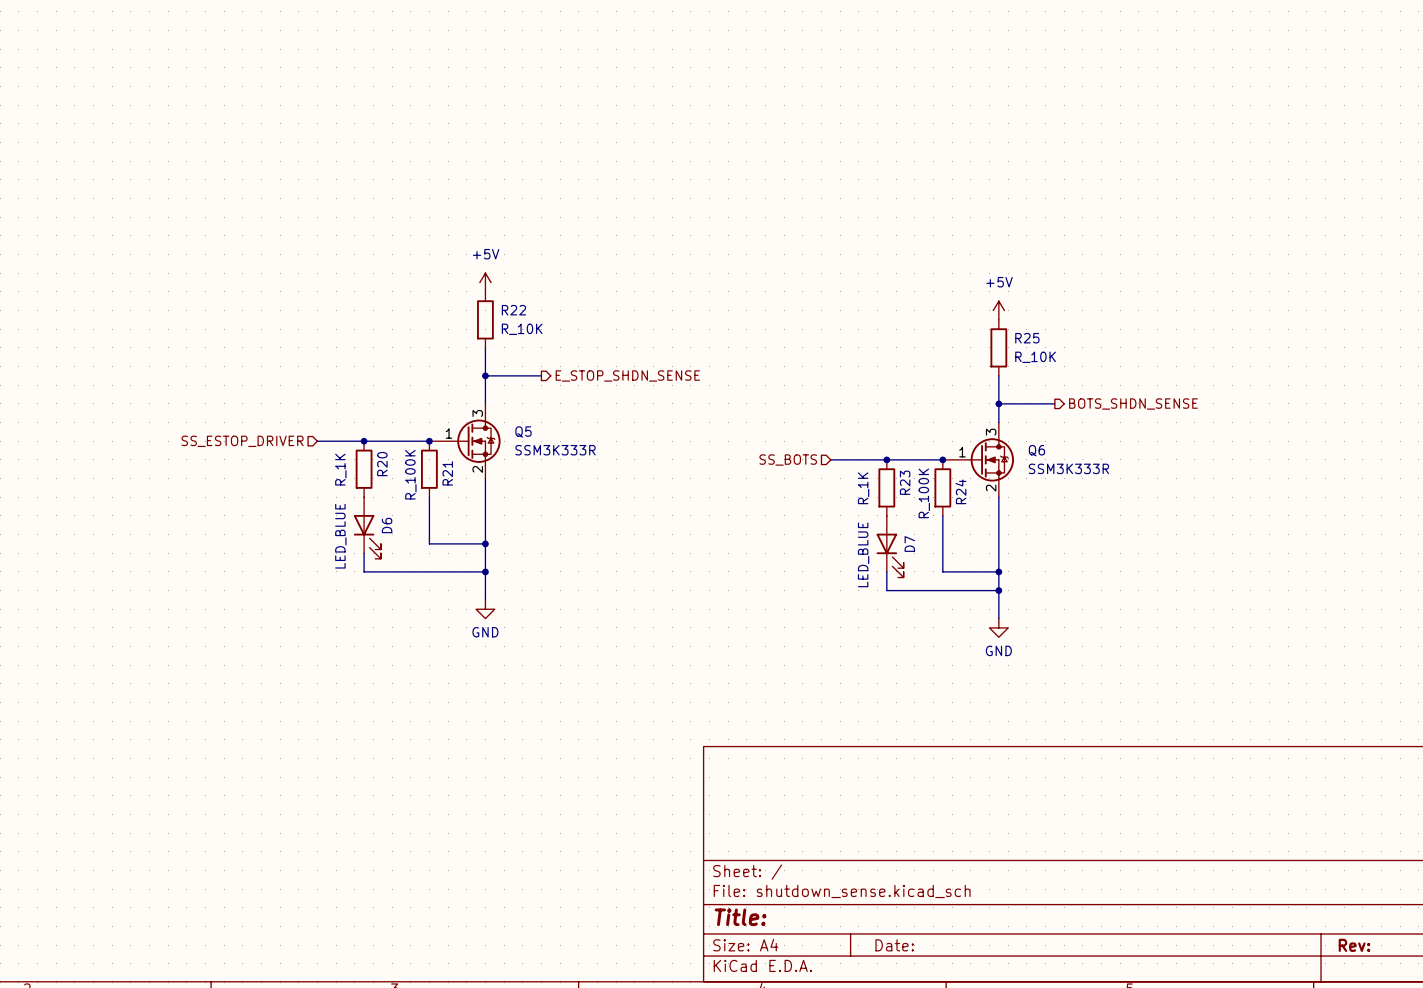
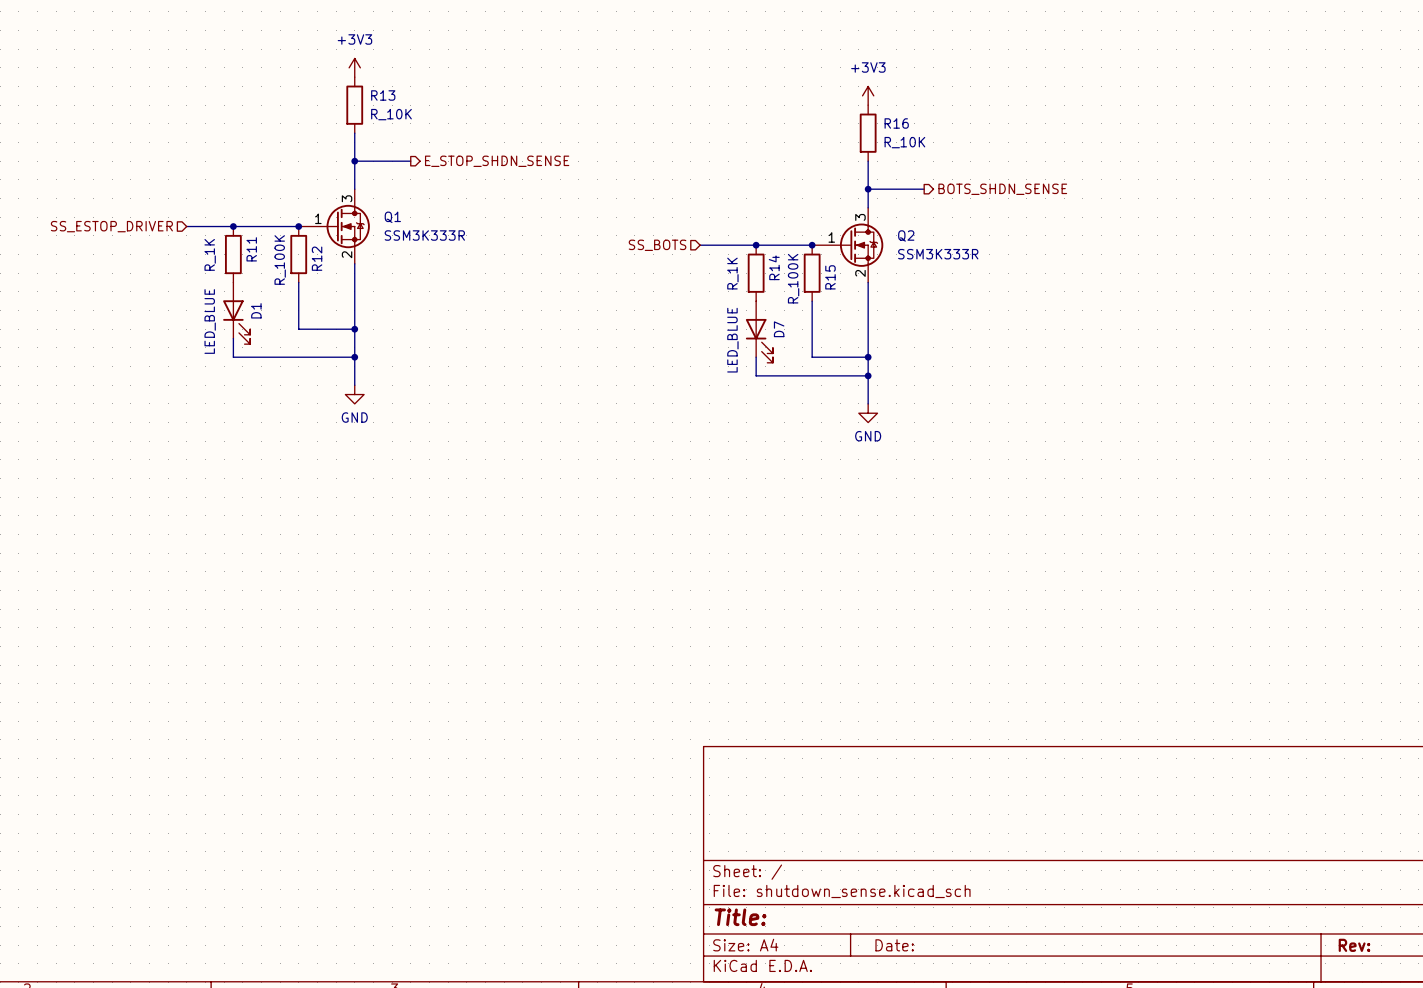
power symbol: none -> +3V3 (354, 67)
power symbol: none -> +3V3 (868, 95)
R13: none -> R_10K (354, 105)
wire: none -> (354, 133) (354, 189)
R16: none -> R_10K (868, 133)
wire: none -> (354, 161) (410, 161)
junction: none -> (354, 161)
hierarchical label: none -> E_STOP_SHDN_SENSE (497, 161)
wire: none -> (868, 161) (868, 207)
wire: none -> (868, 189) (924, 189)
junction: none -> (868, 189)
hierarchical label: none -> BOTS_SHDN_SENSE (1002, 189)
hierarchical label: none -> SS_ESTOP_DRIVER (111, 226)
wire: none -> (186, 226) (298, 226)
junction: none -> (233, 226)
junction: none -> (298, 226)
Q1: none -> SSM3K333R (334, 226)
hierarchical label: none -> SS_BOTS (657, 245)
wire: none -> (700, 245) (812, 245)
junction: none -> (756, 245)
junction: none -> (812, 245)
Q2: none -> SSM3K333R (847, 245)
R11: none -> R_1K (233, 254)
R12: none -> R_100K (298, 254)
wire: none -> (354, 263) (354, 385)
R14: none -> R_1K (756, 273)
R15: none -> R_100K (812, 273)
wire: none -> (298, 282) (298, 329) (354, 329)
power symbol: +5V (485, 282) -> none
wire: none -> (868, 282) (868, 403)
wire: none -> (812, 301) (812, 357) (868, 357)
power symbol: +5V (998, 310) -> none
D1: none -> LED_BLUE (236, 313)
R22: R_10K (485, 319) -> none
junction: none -> (354, 329)
wire: none -> (233, 338) (233, 357) (354, 357)
wire: (485, 347) (485, 403) -> none
R25: R_10K (998, 347) -> none
junction: none -> (354, 357)
wire: none -> (756, 357) (756, 375) (868, 375)
junction: none -> (868, 357)
wire: (485, 375) (541, 375) -> none
junction: (485, 375) -> none
hierarchical label: E_STOP_SHDN_SENSE (627, 375) -> none
junction: none -> (868, 375)
wire: (998, 375) (998, 422) -> none
power symbol: none -> GND (354, 394)
wire: (998, 403) (1054, 403) -> none
junction: (998, 403) -> none
hierarchical label: BOTS_SHDN_SENSE (1133, 403) -> none
power symbol: none -> GND (868, 413)
hierarchical label: SS_ESTOP_DRIVER (242, 441) -> none
wire: (317, 441) (429, 441) -> none
junction: (364, 441) -> none
junction: (429, 441) -> none
Q5: SSM3K333R (464, 441) -> none
hierarchical label: SS_BOTS (788, 459) -> none
wire: (830, 459) (942, 459) -> none
junction: (886, 459) -> none
junction: (942, 459) -> none
Q6: SSM3K333R (978, 459) -> none
R20: R_1K (364, 469) -> none
R21: R_100K (429, 469) -> none
wire: (485, 478) (485, 599) -> none
R23: R_1K (886, 487) -> none
R24: R_100K (942, 487) -> none
wire: (429, 497) (429, 543) (485, 543) -> none
wire: (998, 497) (998, 618) -> none
wire: (942, 515) (942, 571) (998, 571) -> none
D6: LED_BLUE (367, 528) -> none
junction: (485, 543) -> none
D7 position: (890, 546) -> (759, 332)
wire: (364, 553) (364, 571) (485, 571) -> none
junction: (485, 571) -> none
wire: (886, 571) (886, 590) (998, 590) -> none
junction: (998, 571) -> none
junction: (998, 590) -> none
power symbol: GND (485, 609) -> none
power symbol: GND (998, 627) -> none

